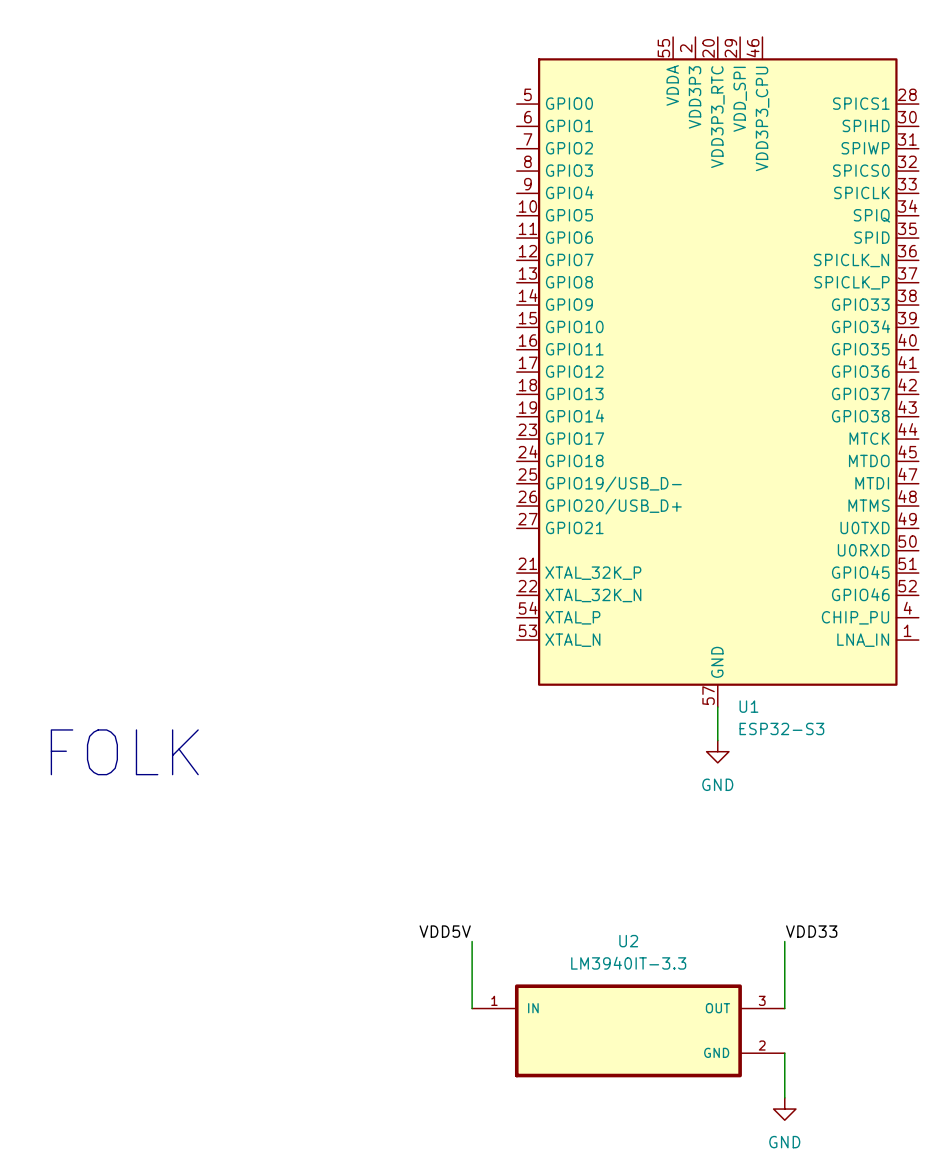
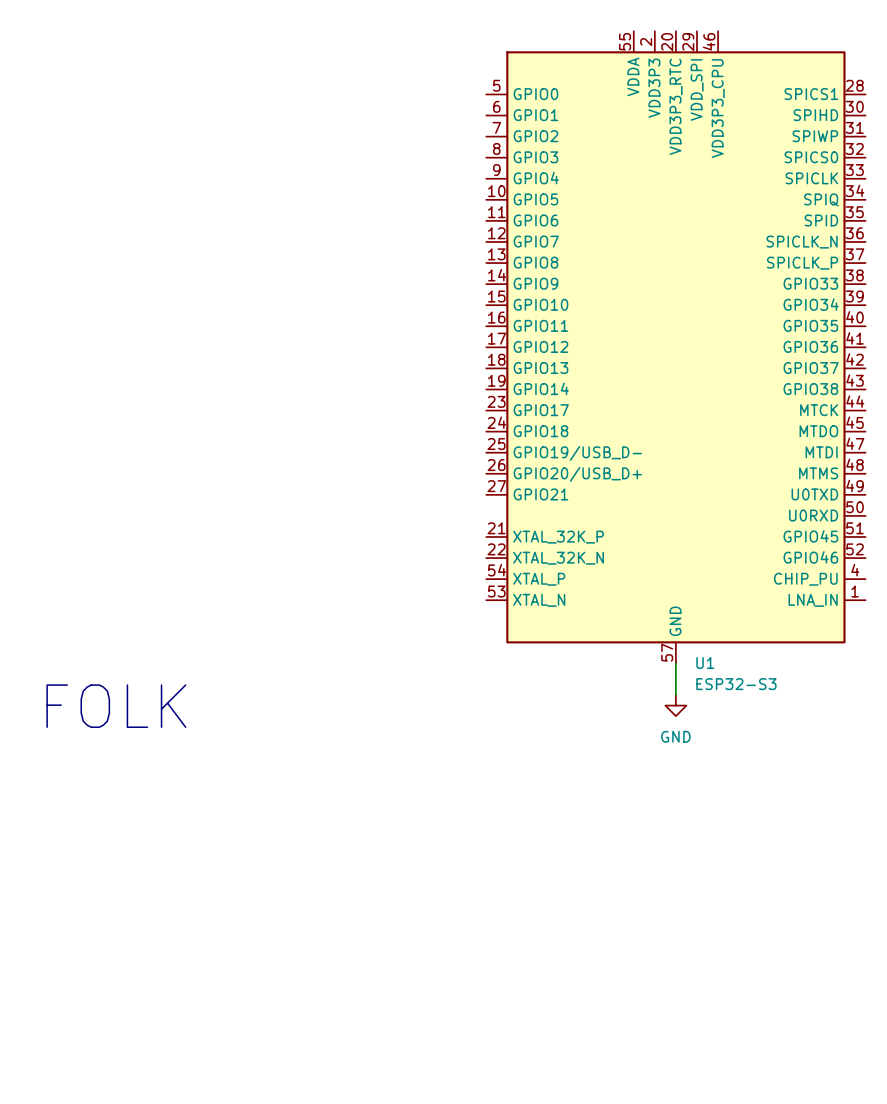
label: VDD5V (445, 931) -> none
label: VDD33 (811, 931) -> none
wire: (472, 941) (472, 1008) -> none
wire: (784, 941) (784, 1008) -> none
U2: LM3940IT-3.3 (628, 1030) -> none
wire: (784, 1053) (784, 1097) -> none
power symbol: GND (784, 1109) -> none

